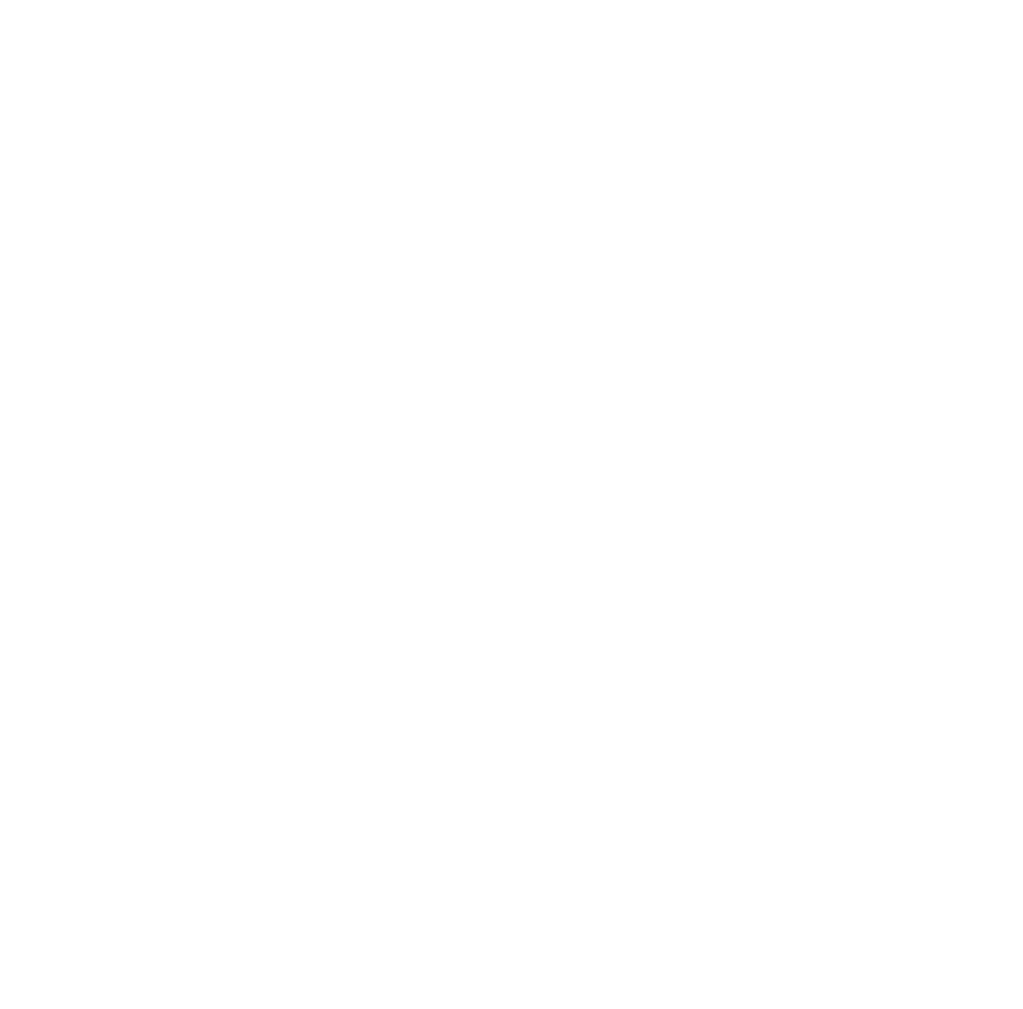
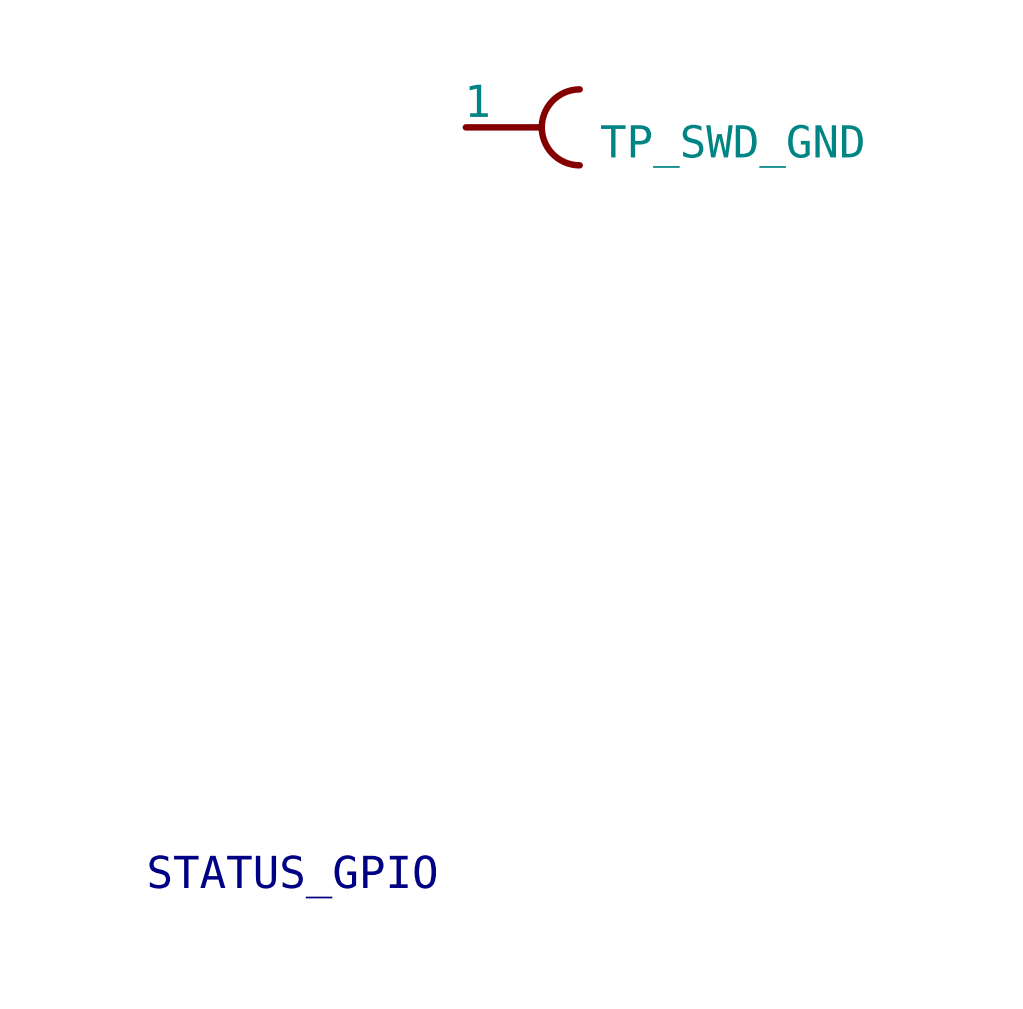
TP_SWD_GND: none -> (522, 127)
text: none -> STATUS_GPIO (292, 876)

